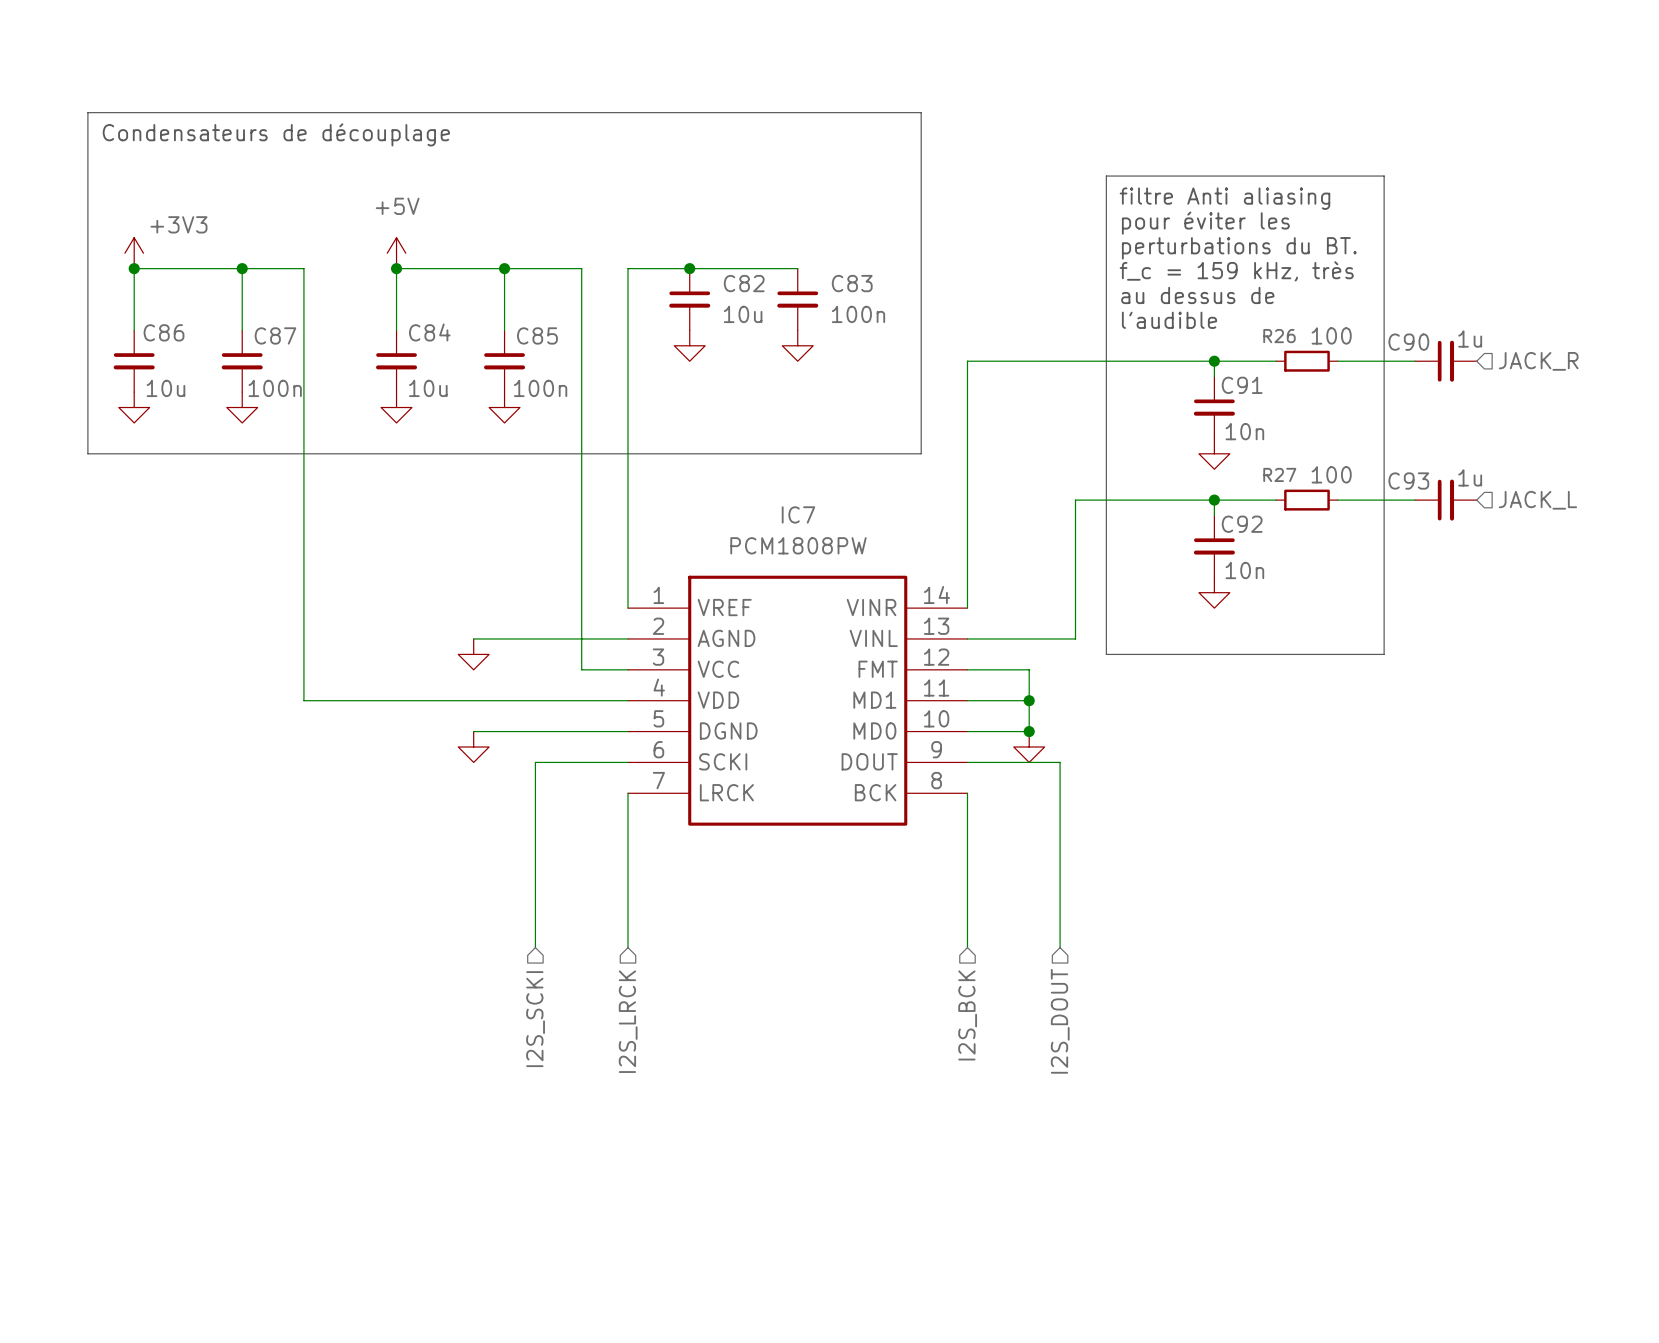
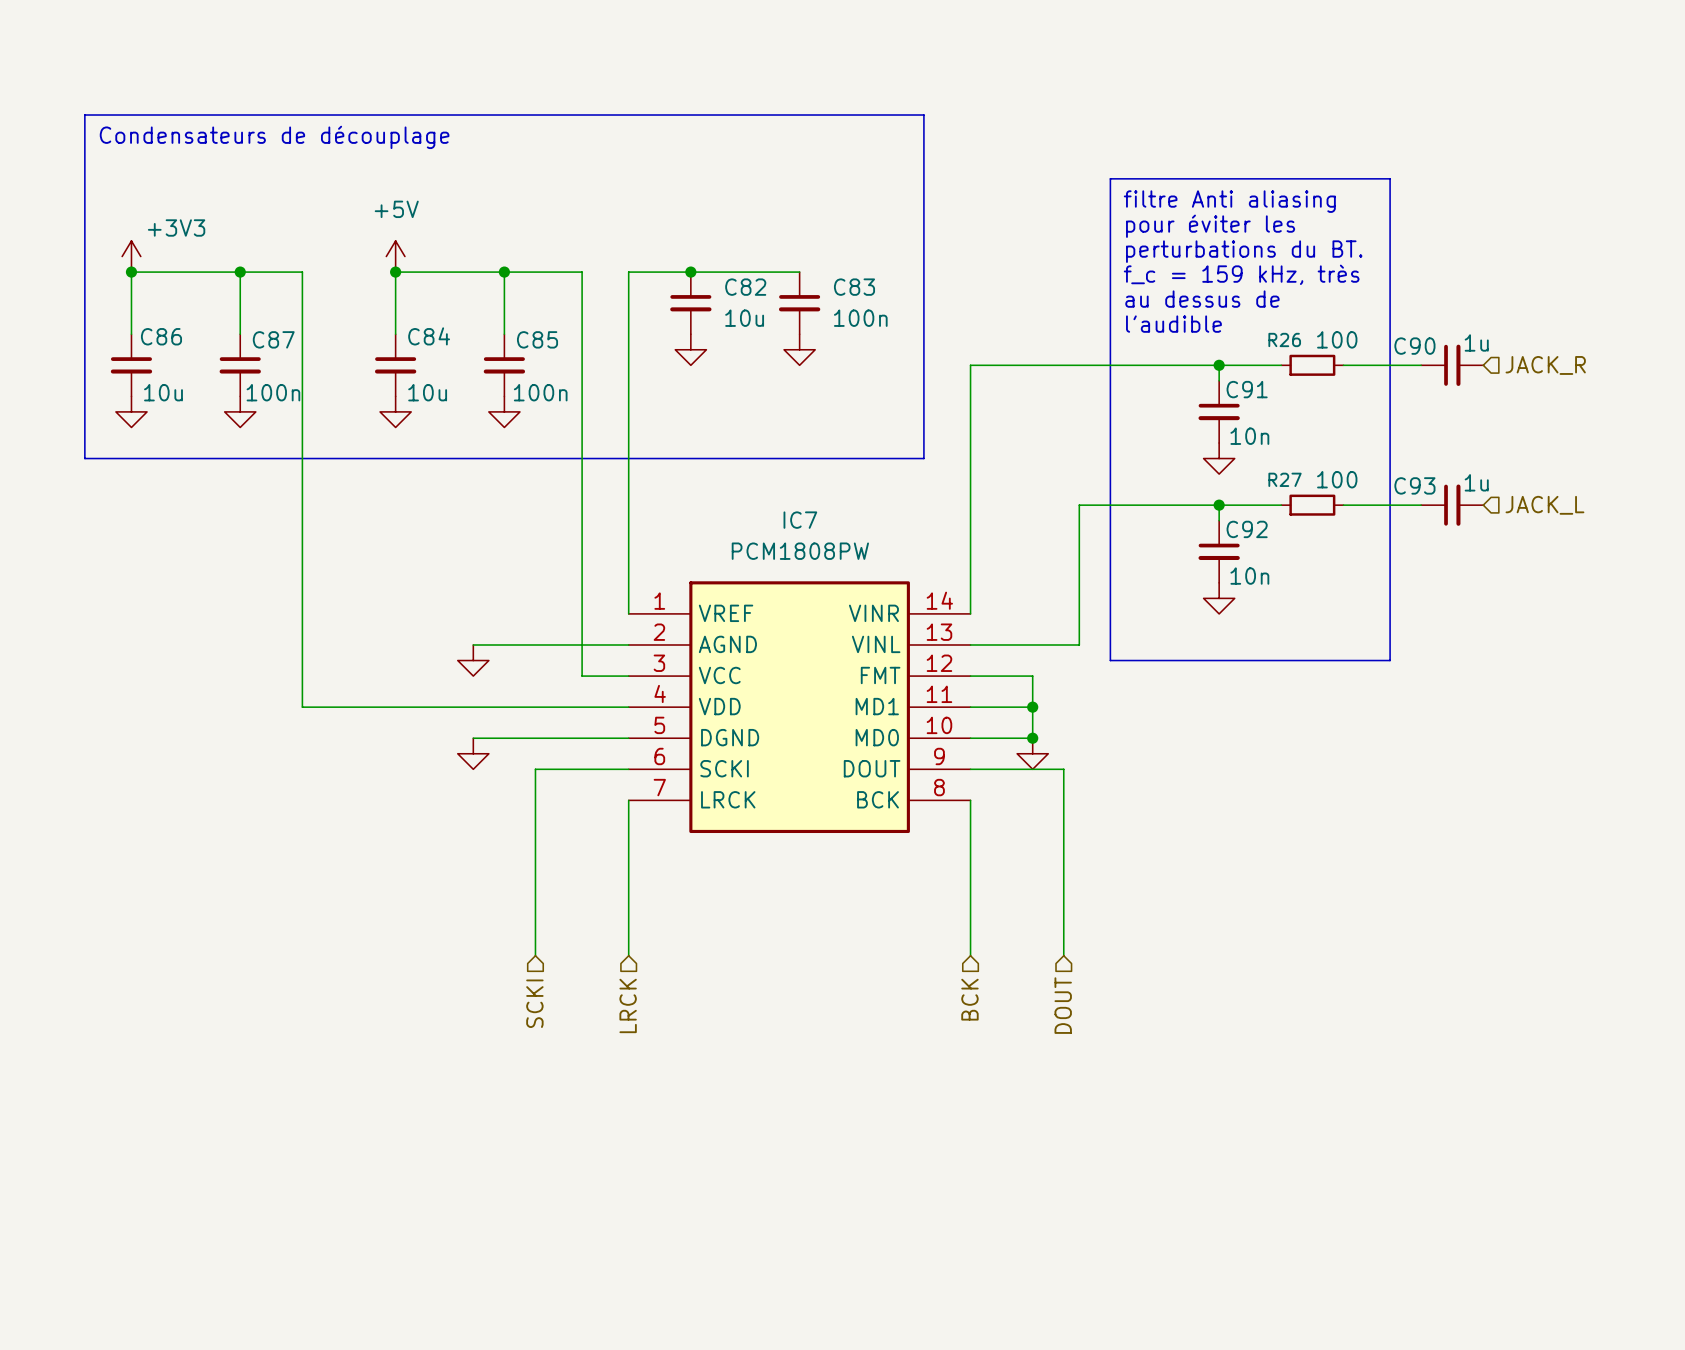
hierarchical label: I2S_BCK (967, 1015) -> BCK (969, 999)
hierarchical label: I2S_SCKI (535, 1019) -> SCKI (534, 1003)
hierarchical label: I2S_LRCK (628, 1021) -> LRCK (628, 1005)
hierarchical label: I2S_DOUT (1060, 1021) -> DOUT (1063, 1005)

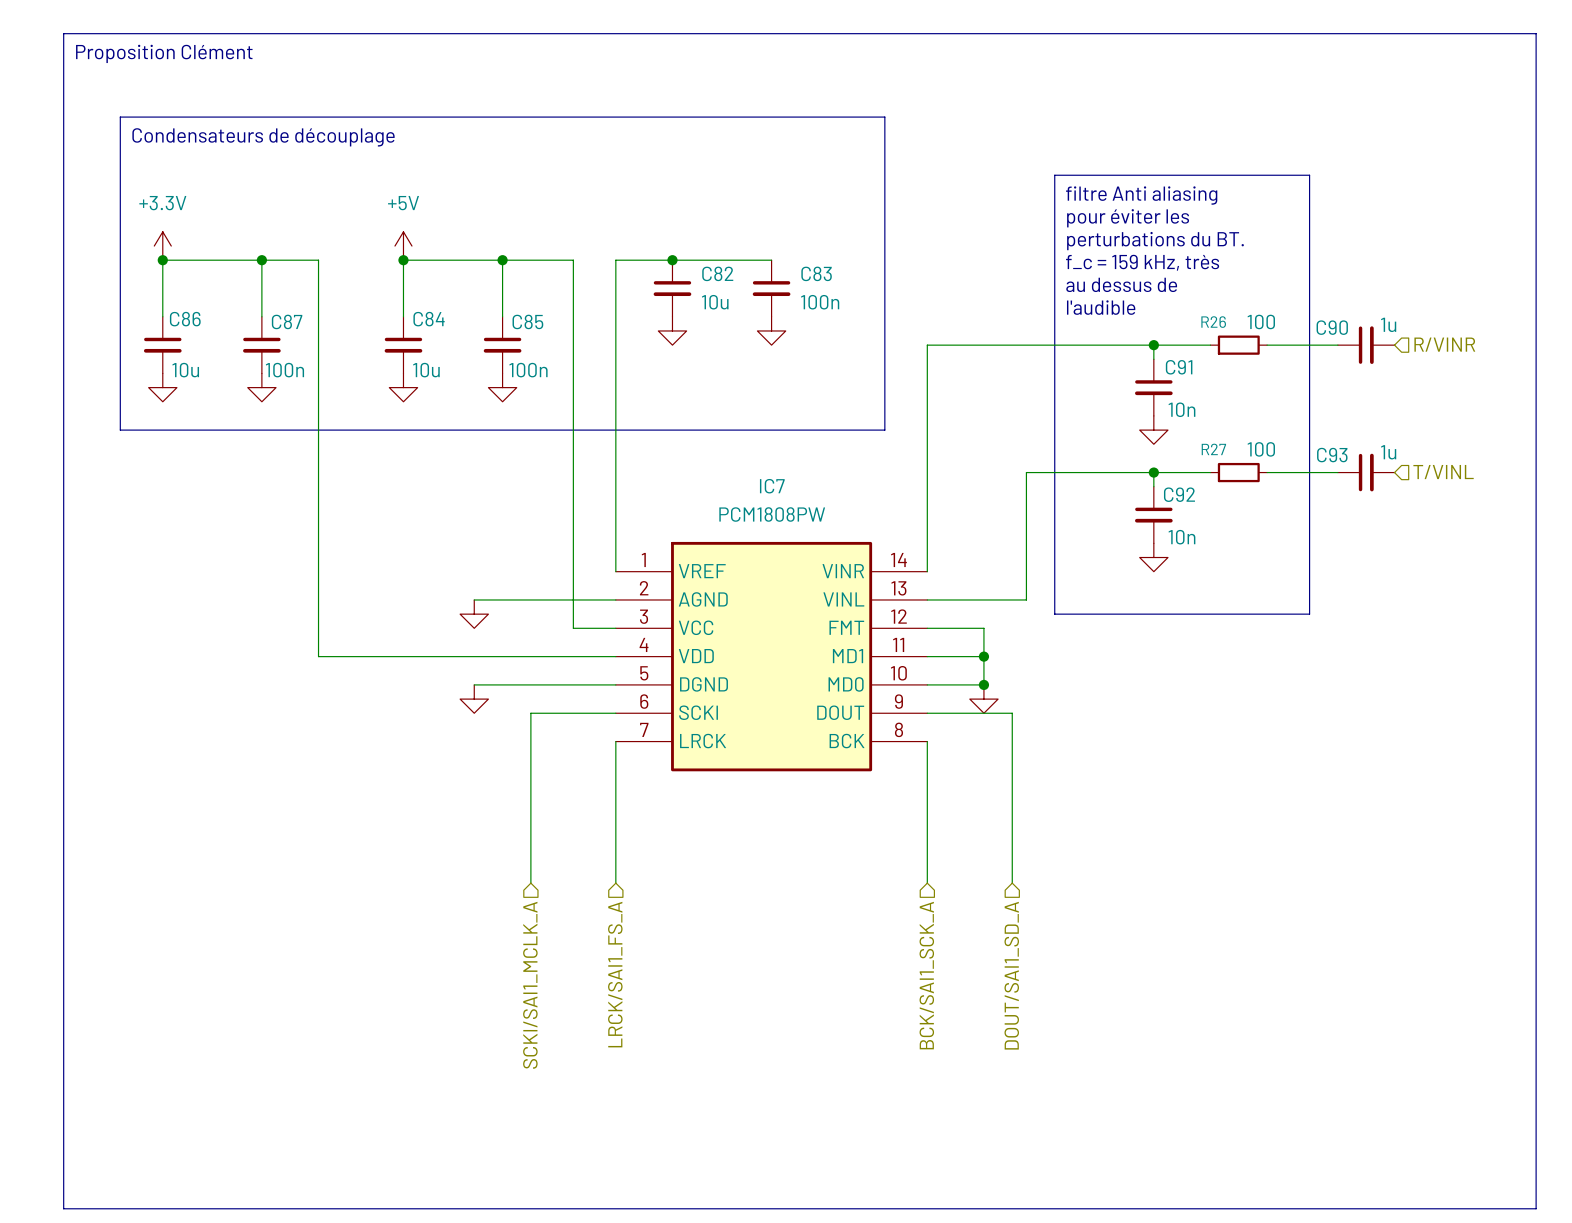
line: none -> (63, 33) (1536, 33) (1536, 1208) (63, 1208) (63, 33)
text: none -> Proposition Clément (164, 53)
power symbol: +3V3 (131, 256) -> +3.3V (162, 246)
hierarchical label: JACK_R (1545, 365) -> R/VINR (1444, 344)
hierarchical label: JACK_L (1544, 505) -> T/VINL (1443, 472)
hierarchical label: BCK (969, 999) -> BCK/SAI1_SCK_A (926, 975)
hierarchical label: SCKI (534, 1003) -> SCKI/SAI1_MCLK_A (530, 985)
hierarchical label: LRCK (628, 1005) -> LRCK/SAI1_FS_A (615, 974)
hierarchical label: DOUT (1063, 1005) -> DOUT/SAI1_SD_A (1011, 975)

